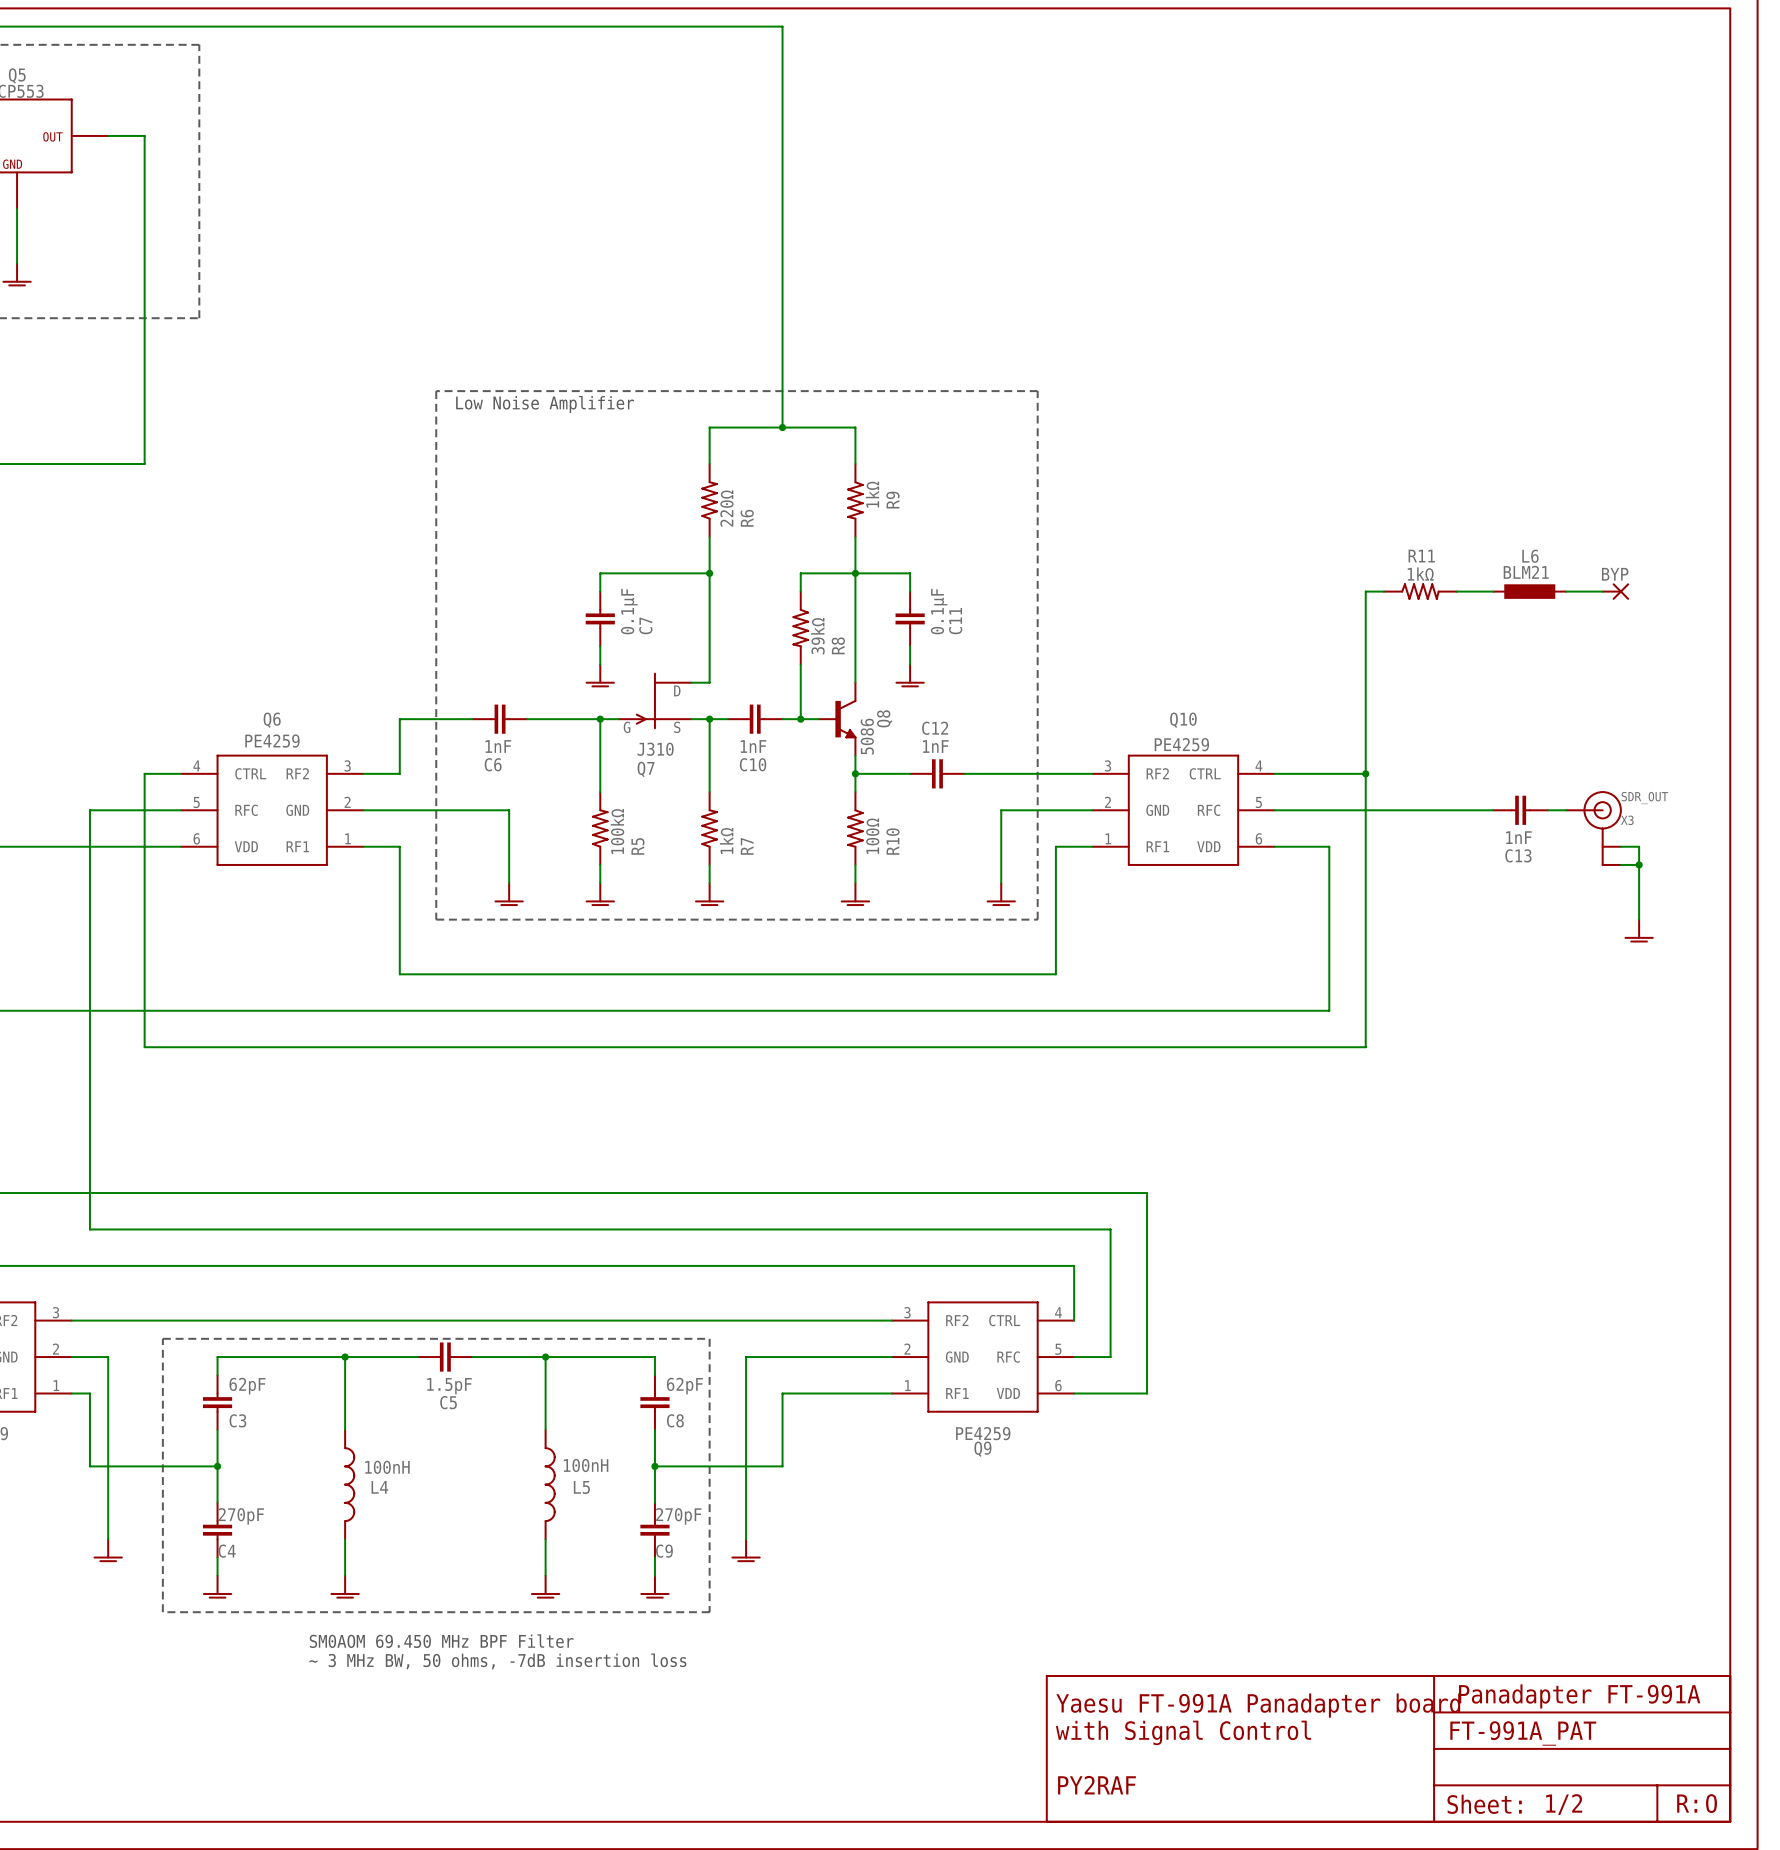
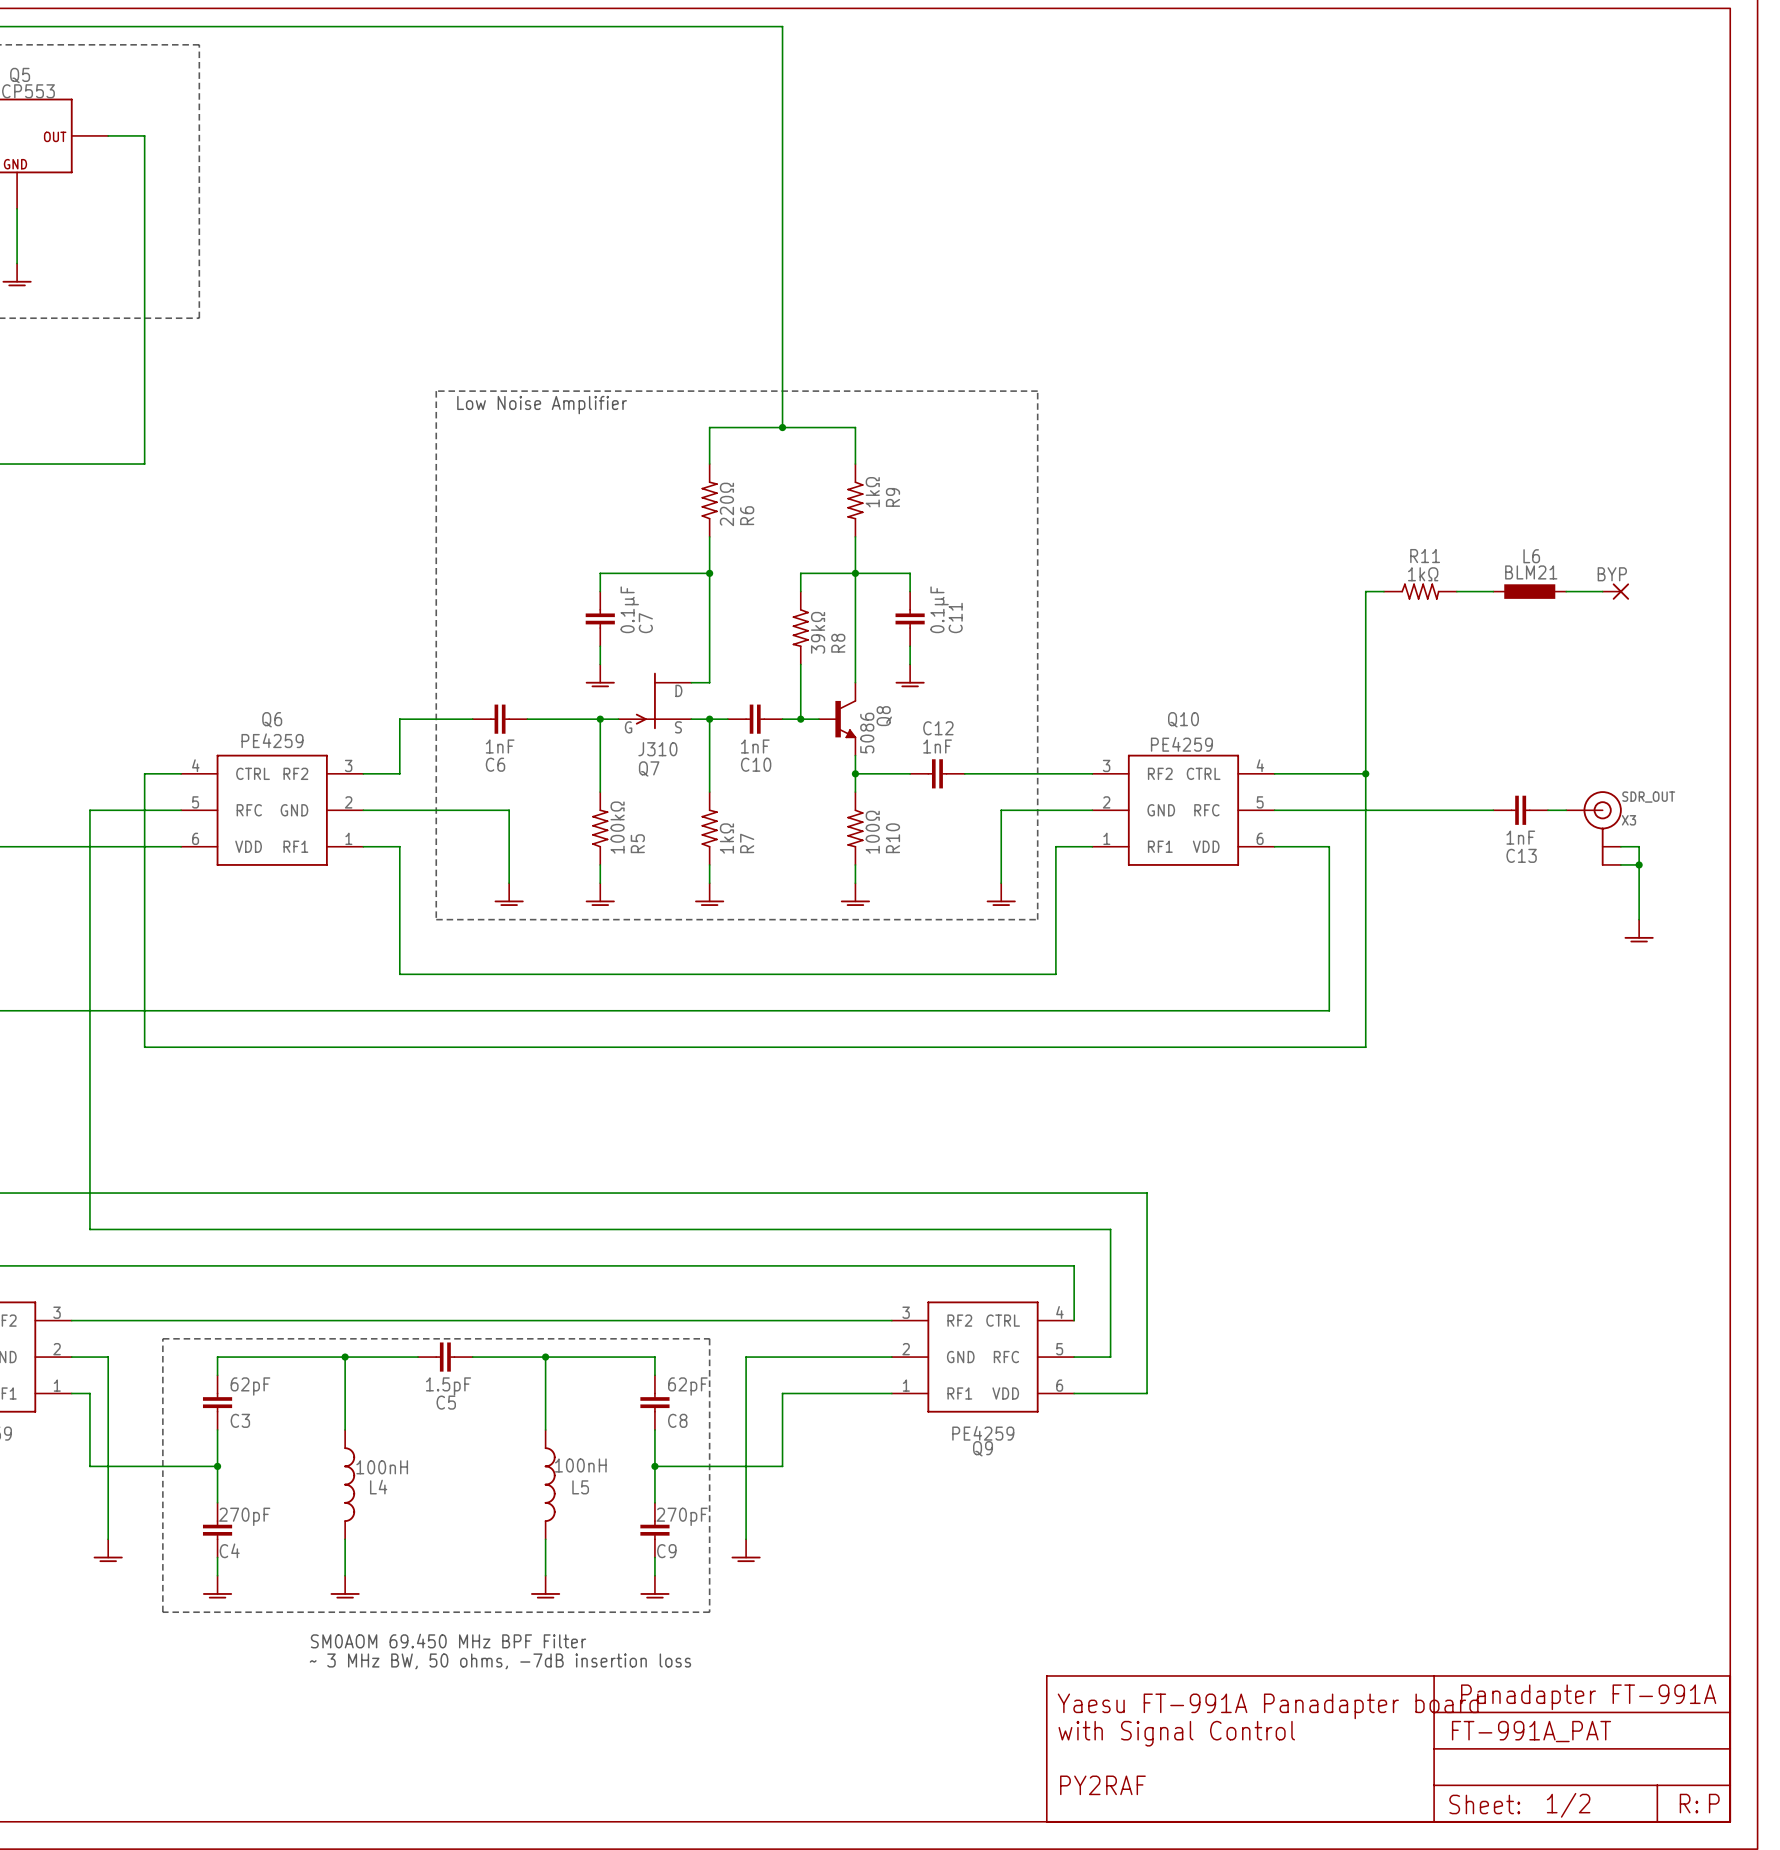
text: O (1711, 1803) -> P (1714, 1803)

